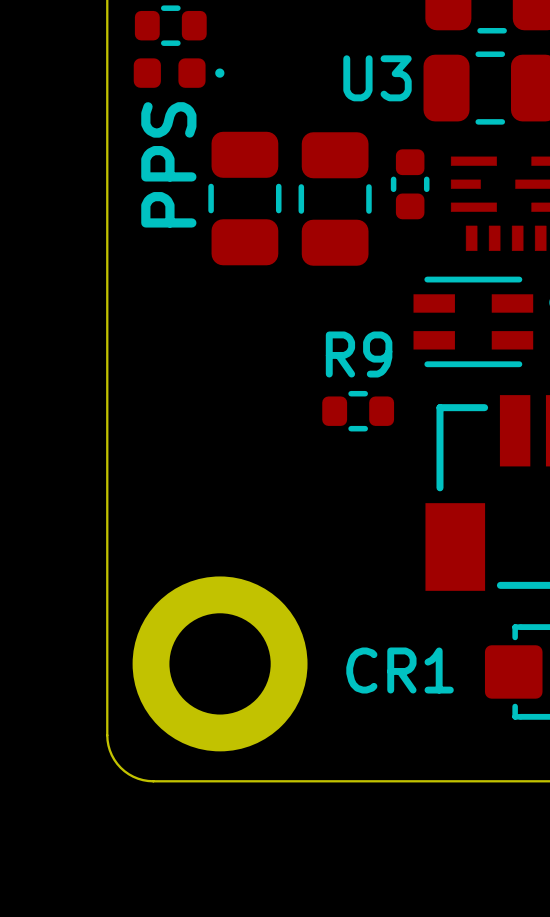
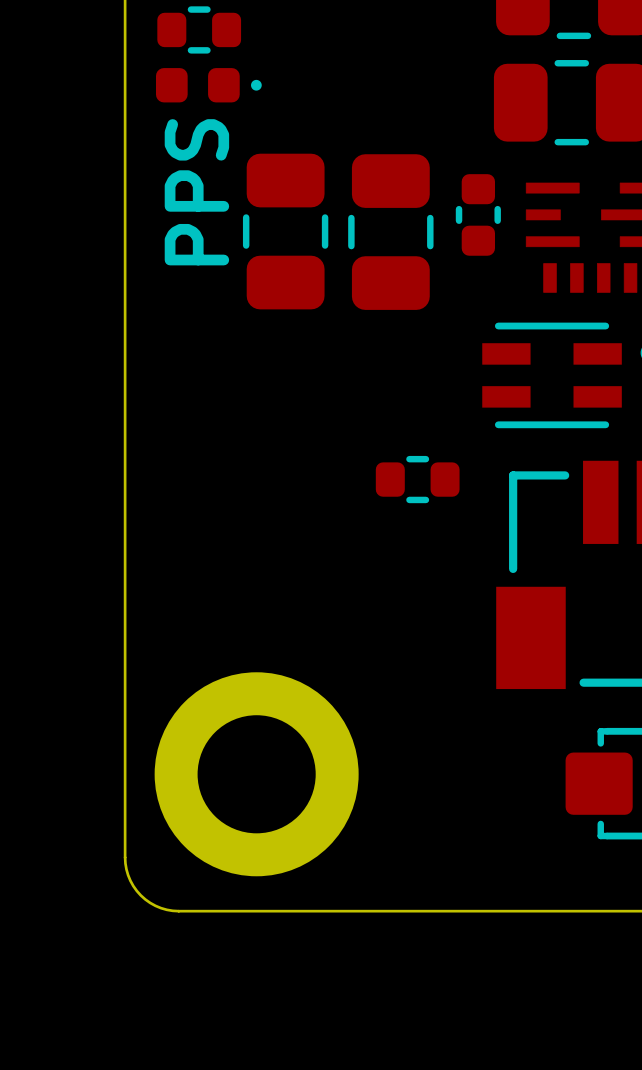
U3 name: U3 (377, 78) -> none
R9 name: R9 (359, 354) -> none
CR1 name: CR1 (400, 670) -> none

